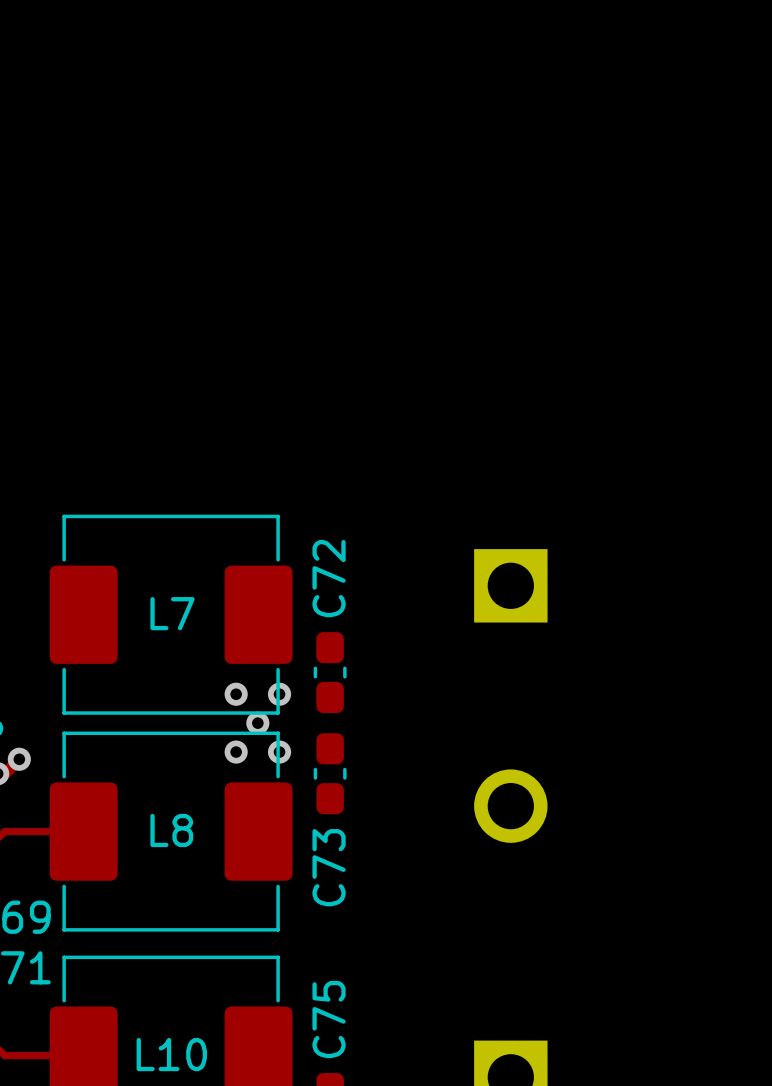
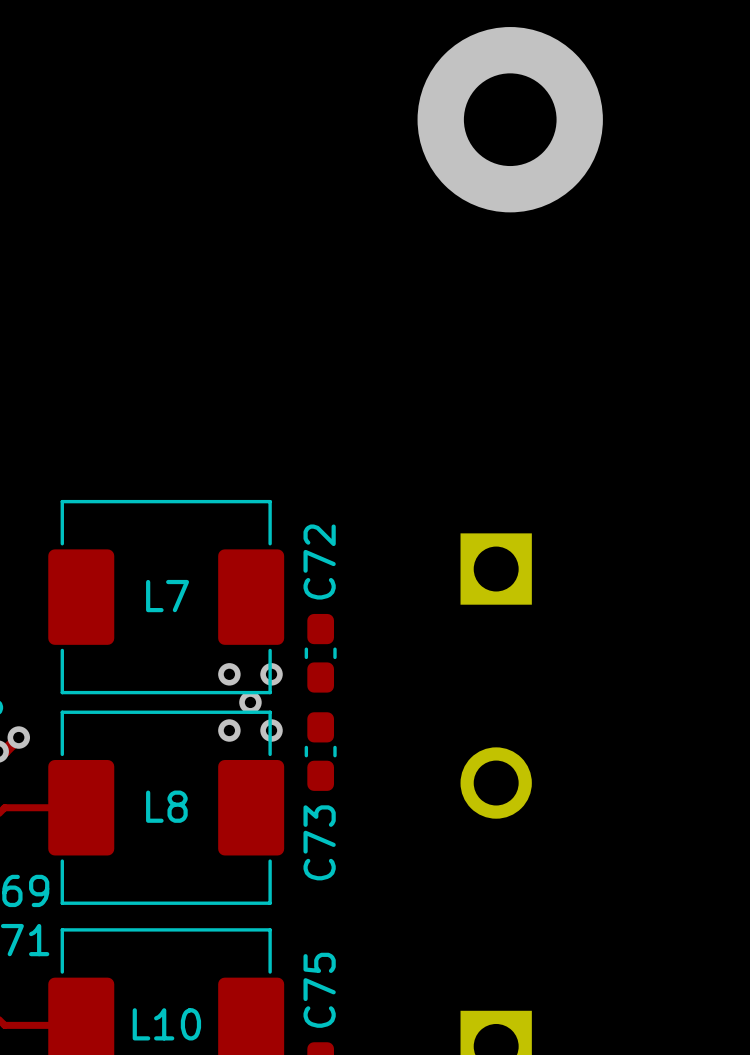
via: none -> (510, 119)

